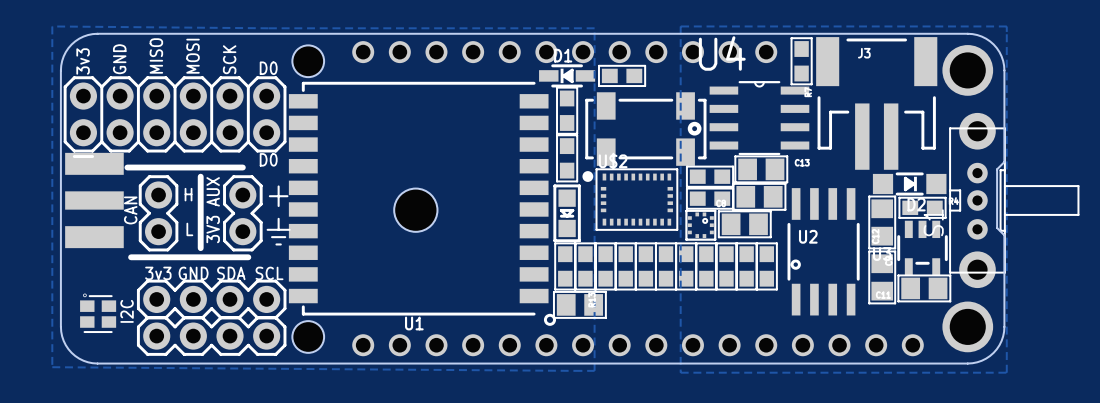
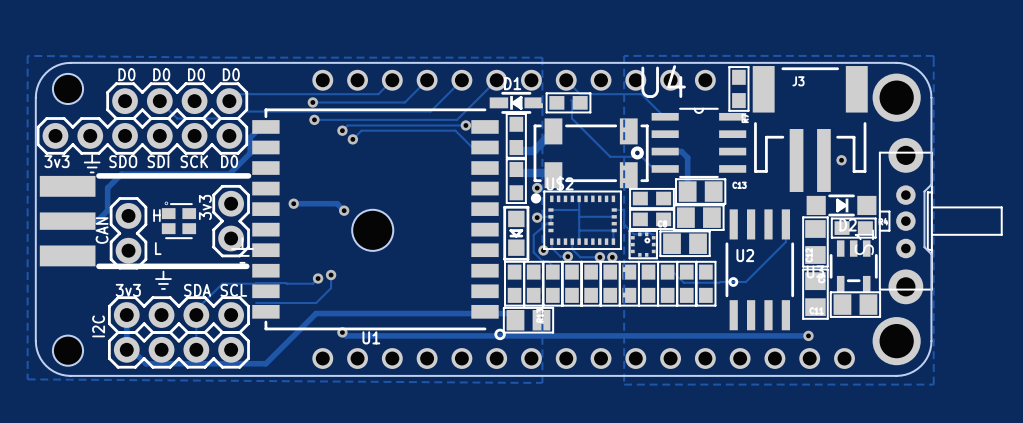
part footprint: [60, 33, 1005, 364] -> [35, 62, 932, 376]
text: none -> D0 (126, 74)
text: none -> D0 (161, 74)
text: none -> D0 (196, 74)
track: none -> (392, 80) (378, 94) (236, 94) (229, 101)
track: none -> (427, 80) (404, 102) (312, 102)
track: none -> (461, 80) (430, 111) (245, 111) (238, 118) (177, 118) (159, 101)
track: none -> (496, 80) (457, 119) (314, 119)
track: none -> (566, 80) (580, 94) (641, 94) (665, 116)
text: MISO (156, 55) -> none
text: MOSI (193, 56) -> none
text: GND (119, 59) -> none
text rotation: 0° (229, 59) -> 90° clockwise (194, 161)
text position: SCK (229, 59) -> SCK (194, 161)
text rotation: 0° (83, 61) -> 90° clockwise (57, 161)
text position: 3v3 (83, 61) -> 3v3 (57, 161)
text position: D0 (268, 68) -> D0 (231, 74)
track: none -> (571, 100) (571, 118) (610, 156) (641, 156) (653, 168) (665, 168)
part: none -> (177, 101)
via: none -> (312, 102)
part footprint: [63, 76, 287, 158] -> [36, 117, 249, 155]
via: none -> (314, 119)
track: none -> (465, 125) (347, 125) (342, 130)
via: none -> (465, 125)
track: none -> (271, 128) (259, 128) (250, 137) (250, 153) (229, 174) (121, 174) (107, 188) (107, 210) (97, 221) (67, 221)
via: none -> (342, 130)
track: none -> (553, 131) (533, 151) (521, 151)
track: none -> (352, 139) (361, 130) (455, 130) (474, 149) (490, 149)
via: none -> (352, 139)
track: none -> (665, 151) (681, 151) (687, 157) (687, 191)
via: none -> (841, 160)
text: none -> SDO (123, 161)
text: none -> SDI (158, 161)
text: none -> ⏚ (92, 163)
track: none -> (521, 172) (551, 172) (553, 175)
line: none -> (98, 175) (248, 175)
text position: D0 (268, 159) -> D0 (229, 161)
via: none -> (537, 188)
line: (127, 167) (242, 167) -> none
line: (200, 176) (200, 248) -> none
track: none -> (579, 198) (579, 241)
track: none -> (293, 203) (337, 203) (344, 210)
via: none -> (293, 203)
text: none -> 3v3 (205, 207)
track: none -> (550, 209) (579, 210)
track: none -> (614, 209) (624, 210) (624, 224) (633, 234) (653, 234)
via: none -> (344, 210)
track: none -> (614, 216) (579, 217)
text: + (278, 196) -> none
track: none -> (537, 217) (550, 216) (550, 223) (546, 223) (533, 235) (533, 252) (542, 261) (547, 261) (558, 272)
via: none -> (537, 217)
track: none -> (785, 224) (785, 241) (745, 281) (683, 282) (672, 272)
text: 3V3 AUX (213, 210) -> none
track: none -> (579, 231) (614, 230) (613, 241)
part position: (242, 213) -> (231, 221)
track: none -> (551, 241) (551, 247) (560, 256) (567, 256)
track: none -> (572, 241) (572, 249) (580, 257) (599, 257)
via: none -> (543, 250)
via: none -> (567, 256)
via: none -> (599, 257)
via: none -> (612, 257)
line: none -> (98, 266) (246, 266)
line: (131, 257) (248, 257) -> none
track: none -> (331, 275) (331, 288) (316, 302) (256, 302)
via: none -> (331, 275)
track: none -> (318, 278) (312, 283) (222, 283) (196, 309) (196, 344)
via: none -> (318, 278)
text: GND (193, 273) -> ⏚ (163, 280)
track: none -> (126, 309) (126, 344) (145, 363) (265, 363) (316, 313) (514, 313) (520, 320)
part position: (98, 313) -> (178, 220)
track: none -> (342, 332) (345, 335) (808, 335)
via: none -> (342, 332)
via: none -> (808, 335)

